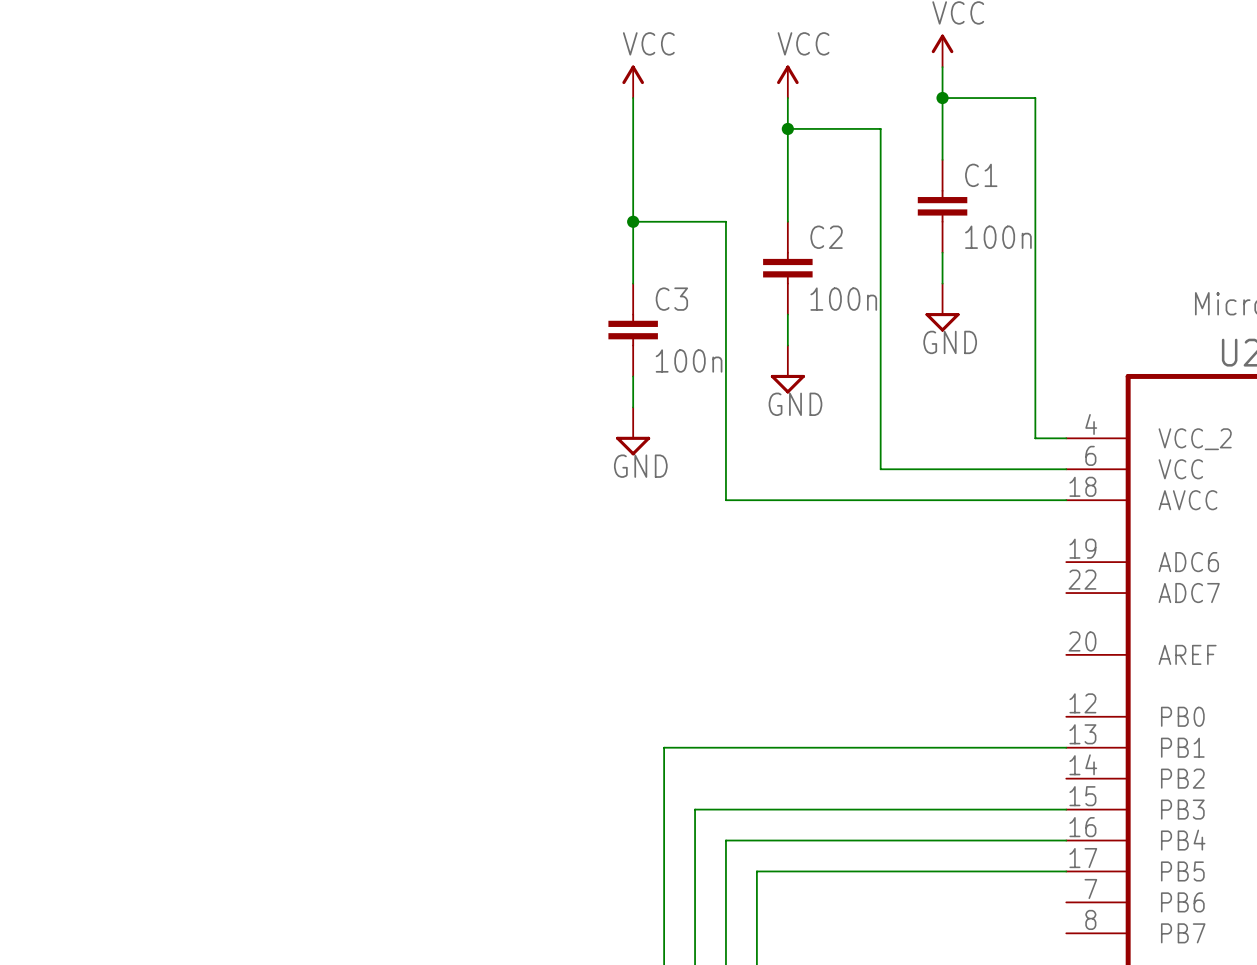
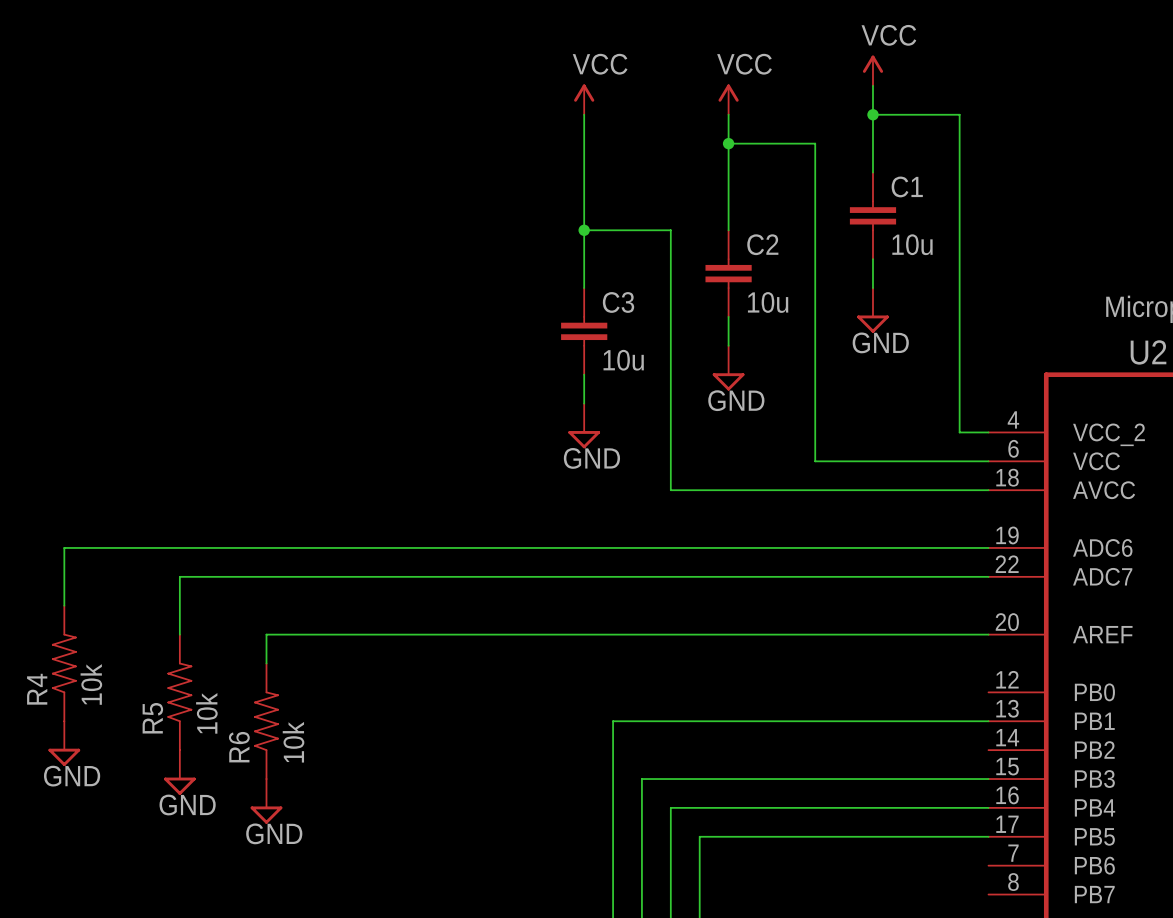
C1 value: 100n (998, 237) -> 10u (912, 244)
C2 value: 100n (843, 299) -> 10u (768, 302)
C3 value: 100n (689, 360) -> 10u (623, 360)
wire: none -> (988, 547) (64, 547) (64, 605)
wire: none -> (988, 576) (179, 576) (179, 634)
wire: none -> (988, 634) (266, 634) (266, 663)
R4: none -> 10k (64, 663)
R5: none -> 10k (179, 692)
R6: none -> 10k (266, 721)
power symbol: none -> GND (64, 743)
power symbol: none -> GND (179, 772)
power symbol: none -> GND (266, 801)

